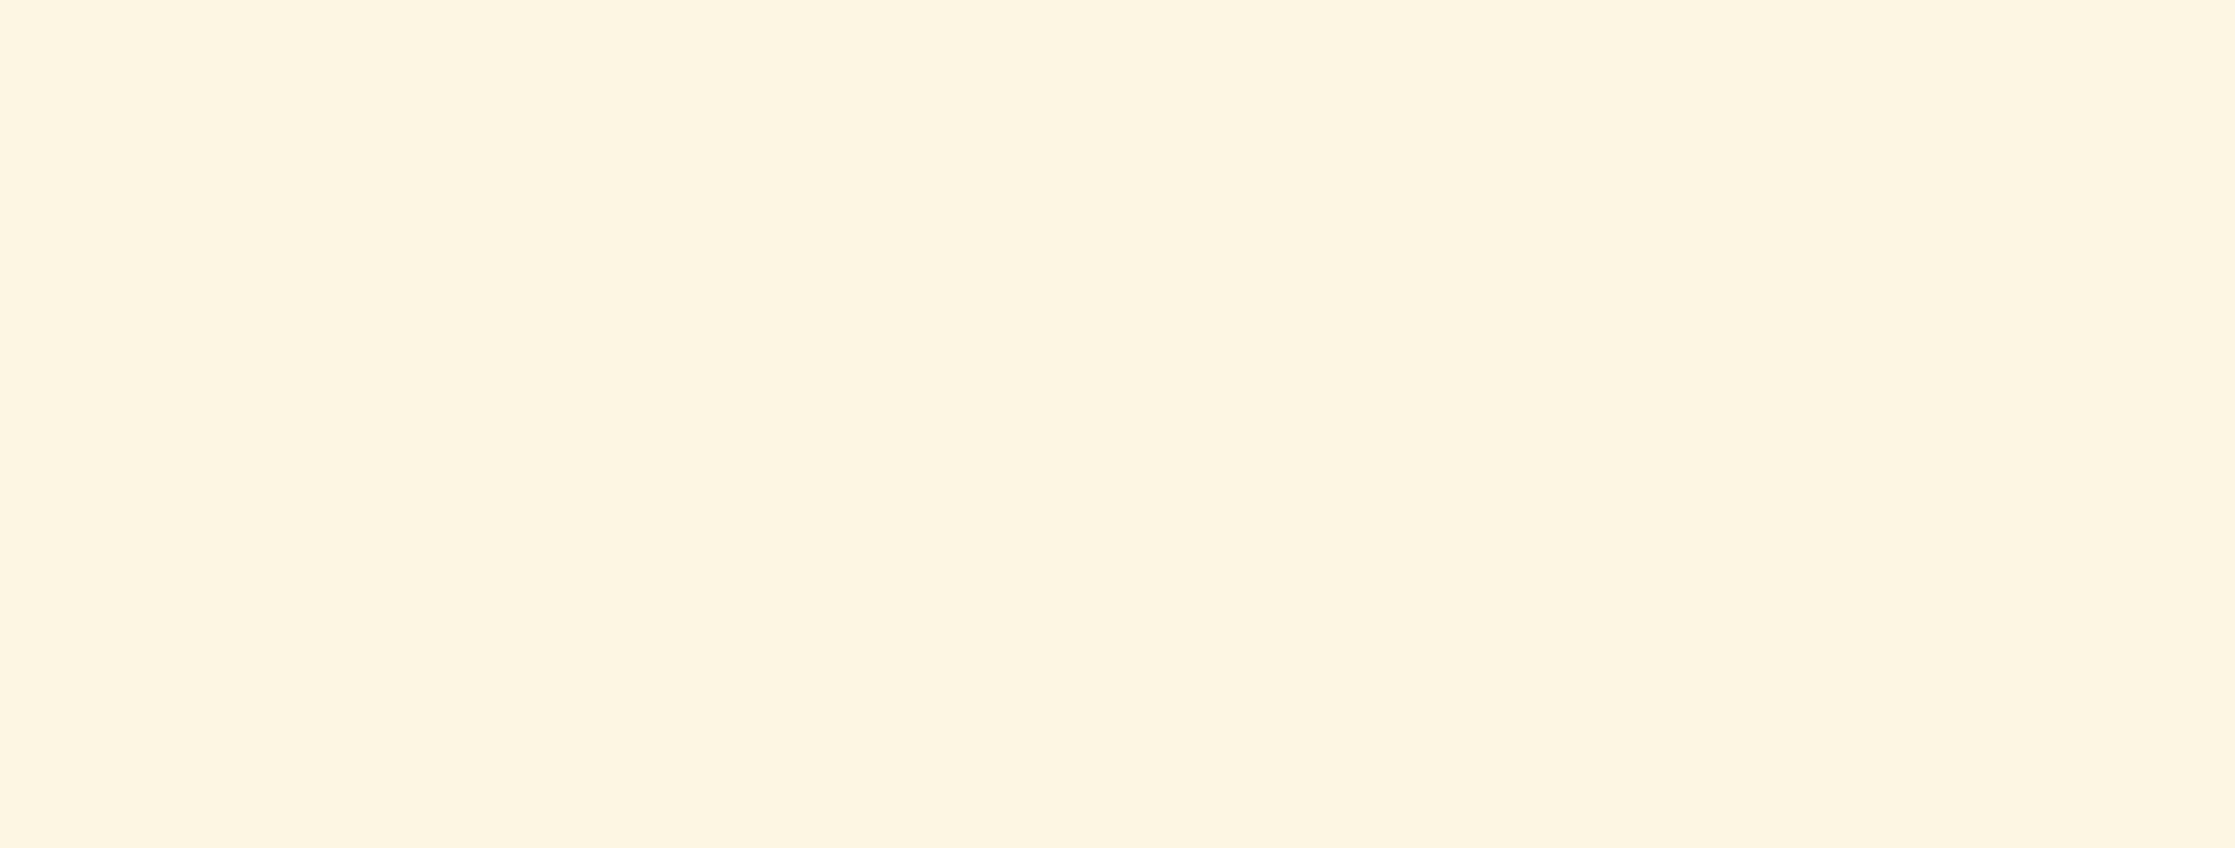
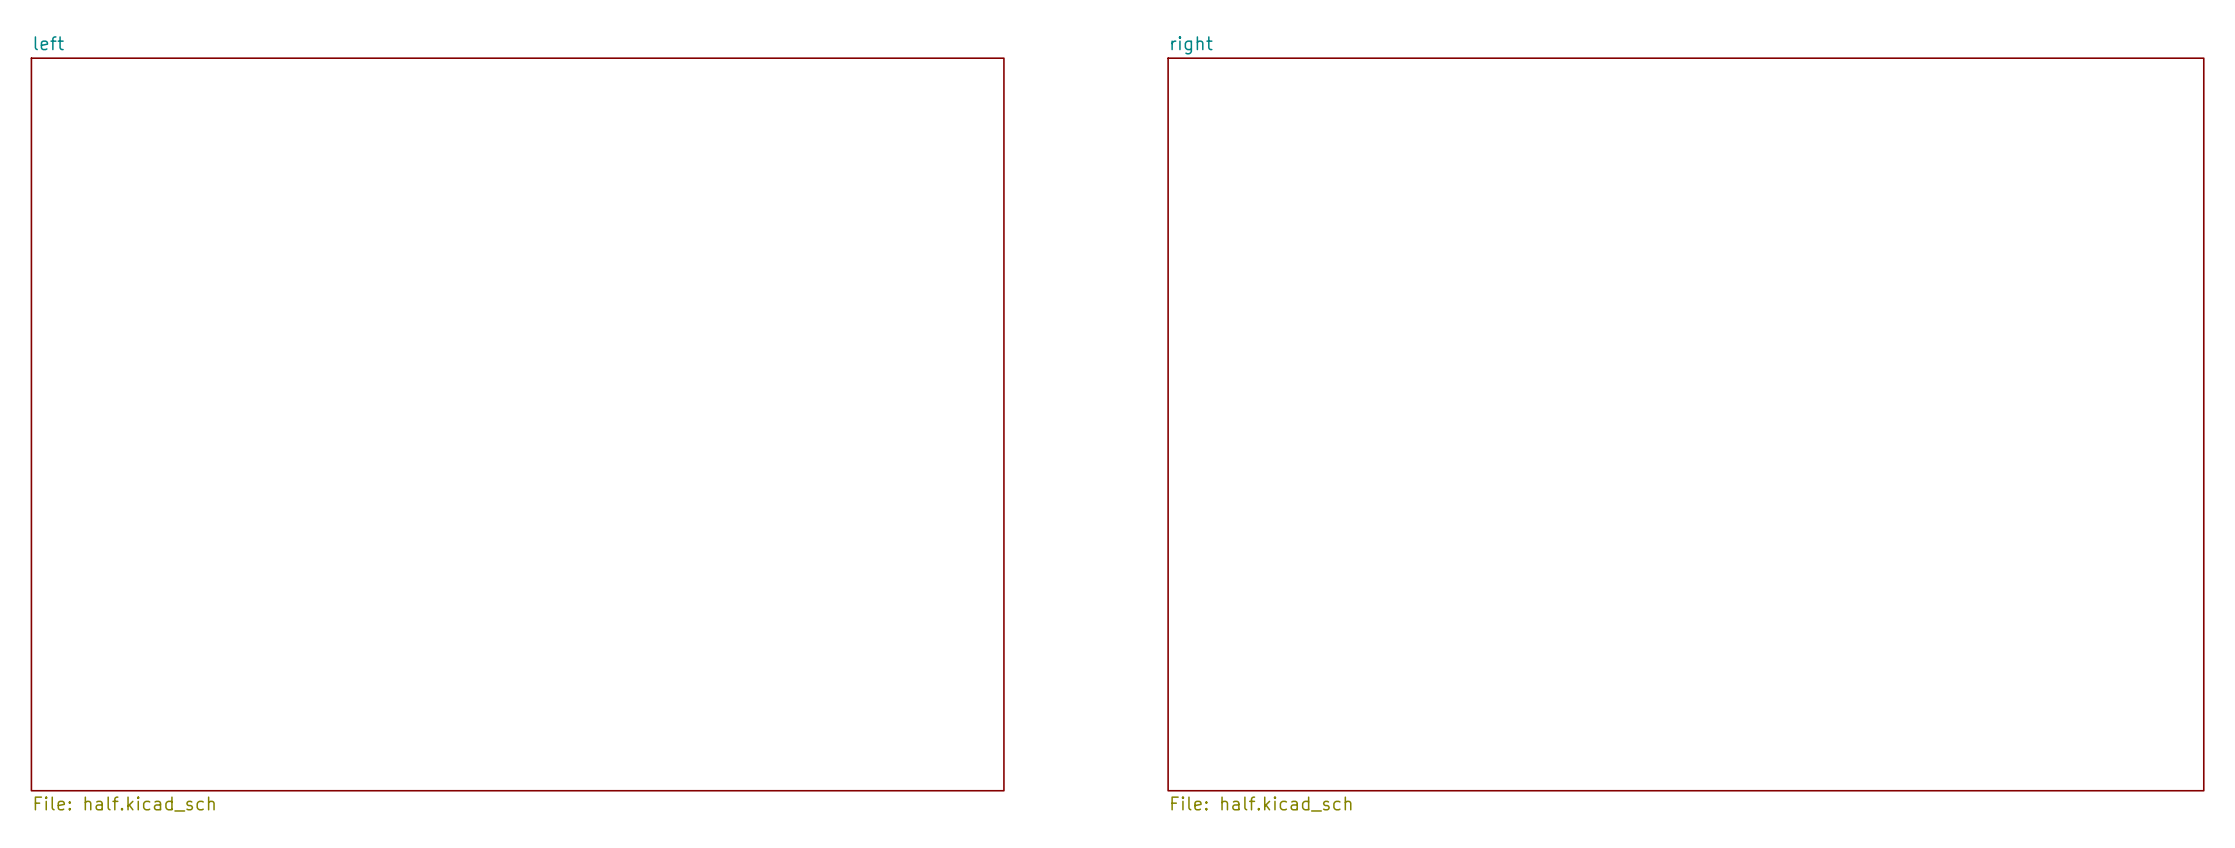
sheet left: none -> File: half.kicad_sch (517, 424)
sheet right: none -> File: half.kicad_sch (1685, 424)

